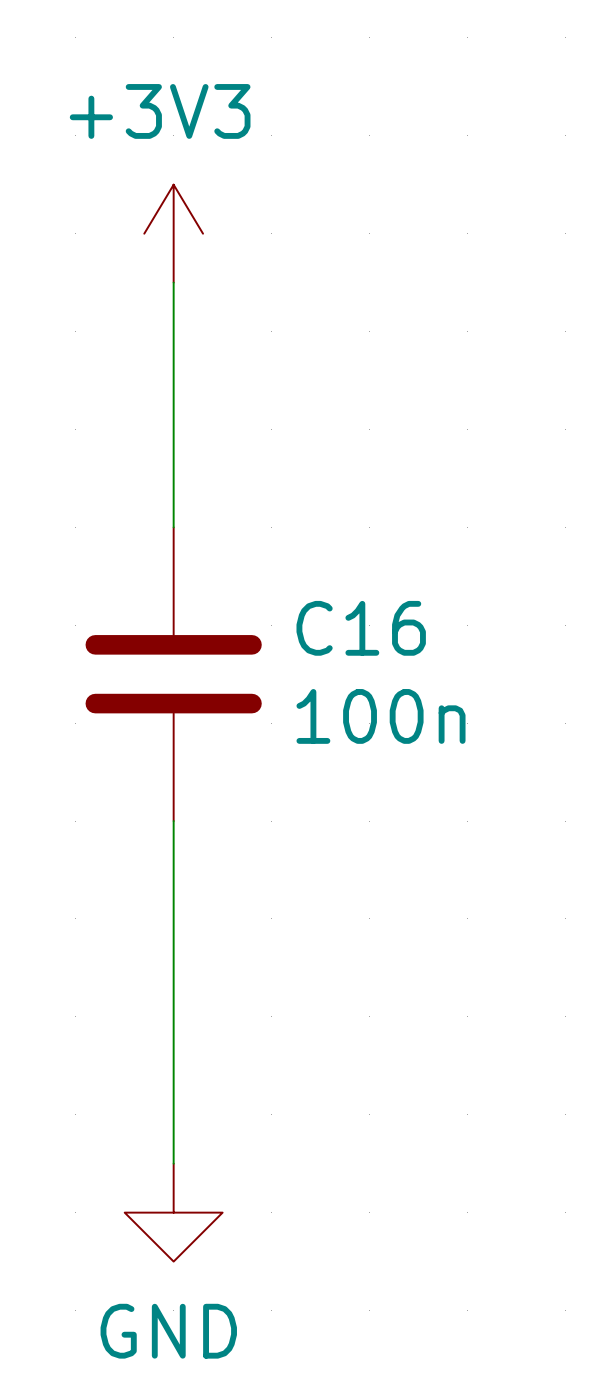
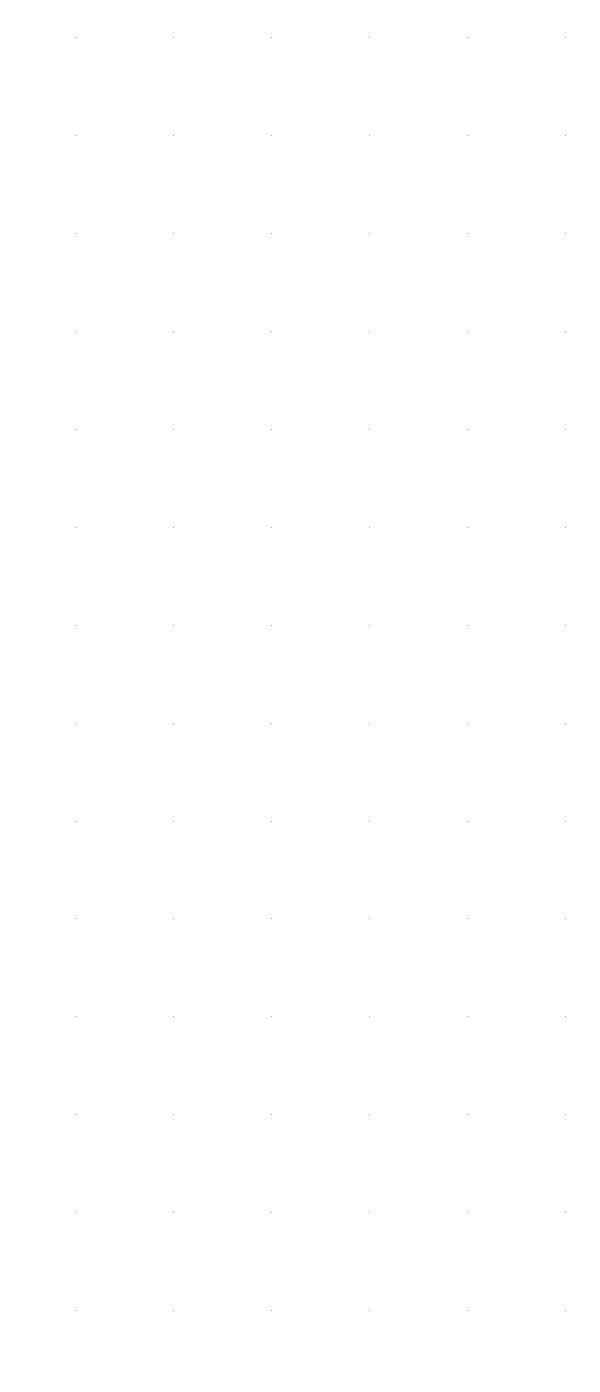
power symbol: +3V3 (173, 233) -> none
wire: (173, 282) (173, 527) -> none
C16: 100n (173, 674) -> none
wire: (173, 821) (173, 1163) -> none
power symbol: GND (173, 1212) -> none

